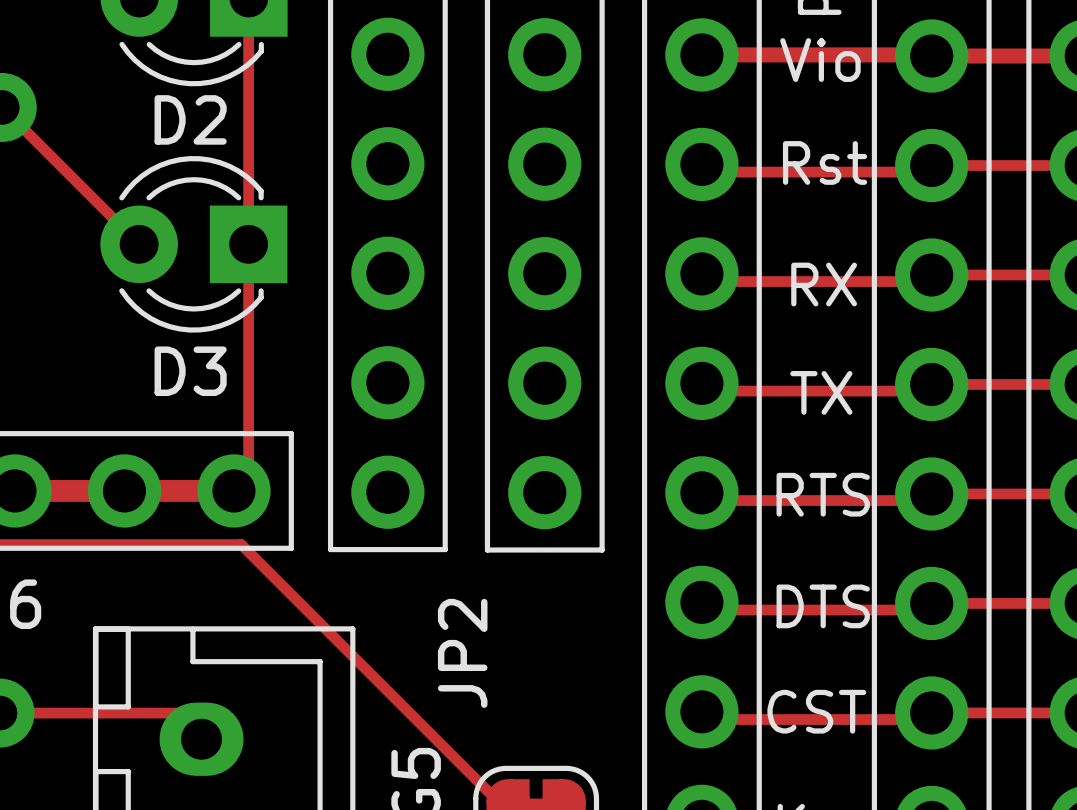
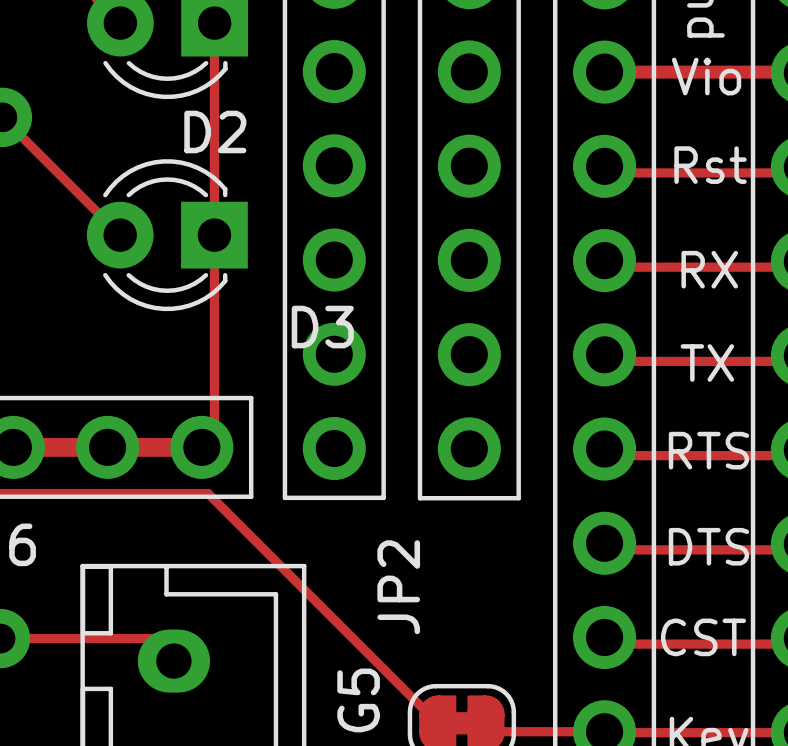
D2 name position: D2 (190, 119) -> D2 (215, 131)
D3 name position: D3 (190, 371) -> D3 (322, 327)

